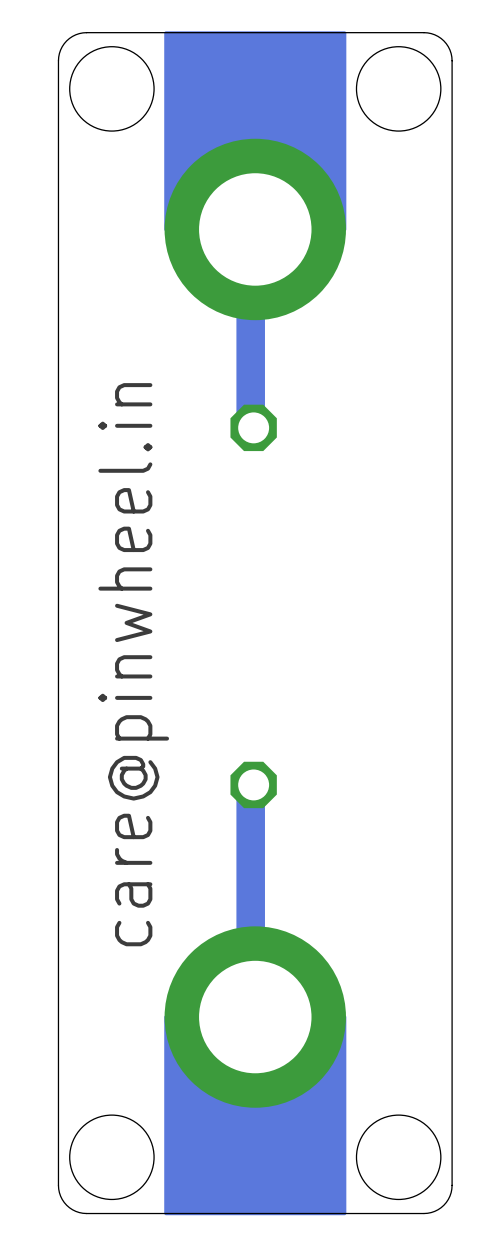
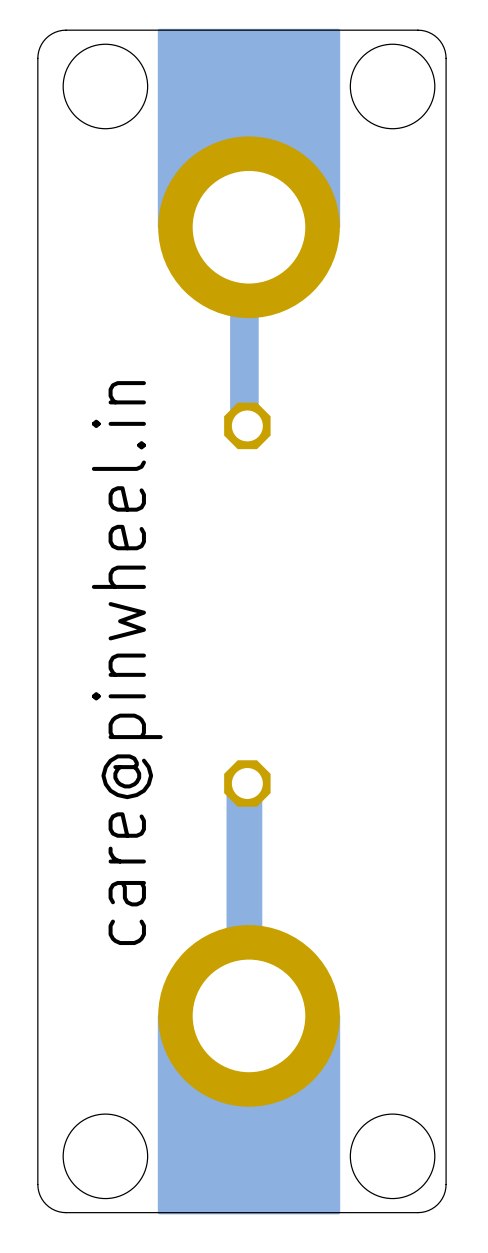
board edge: (86, 32) (75, 34) (66, 40) (60, 50) (58, 60) (58, 1185) (60, 1196) (66, 1205) (75, 1211) (86, 1213) -> (80, 30) (62, 30) (51, 33) (41, 44) (37, 58) (37, 1184) (41, 1198) (51, 1208) (62, 1212) (80, 1212)
track width: thin (250, 785) (250, 1016) -> thick (244, 783) (244, 1015)

